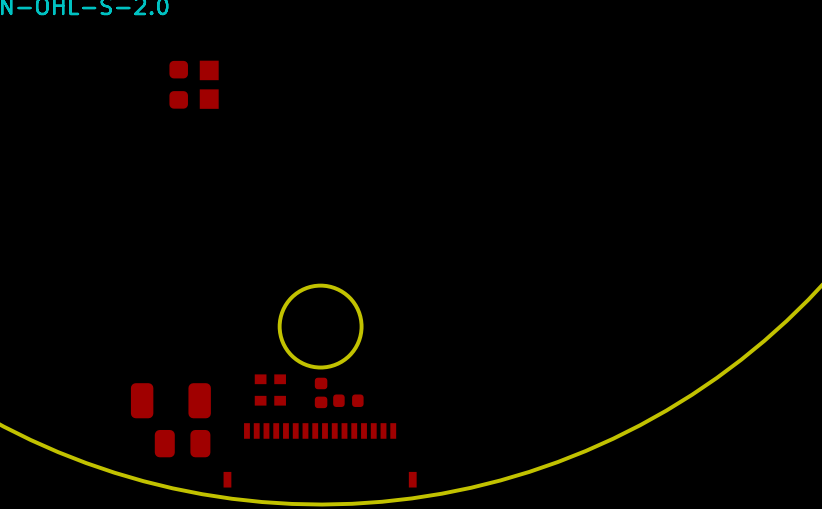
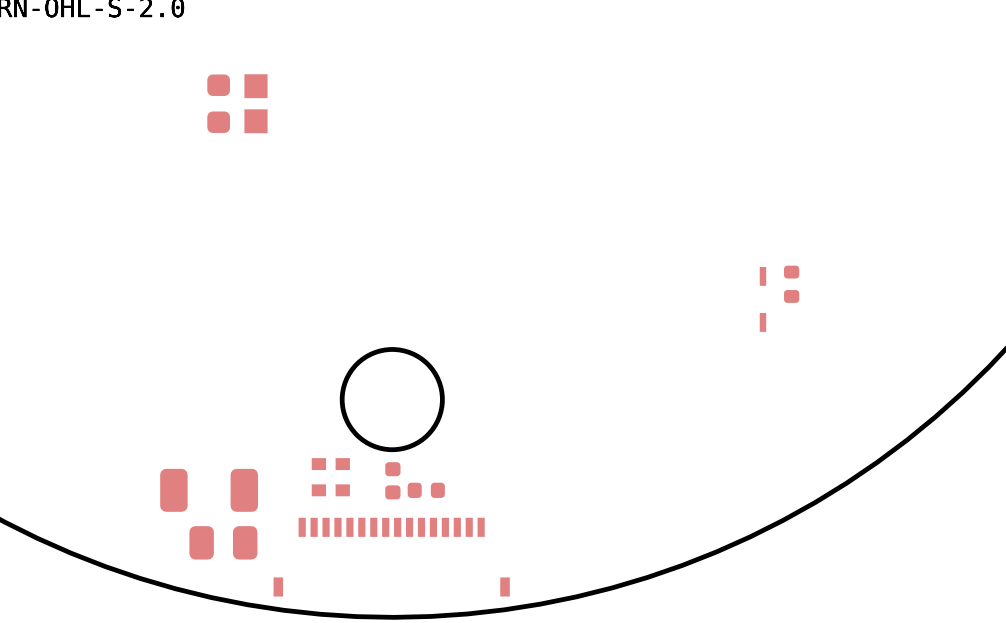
part: none -> (791, 284)
part: none -> (762, 299)

